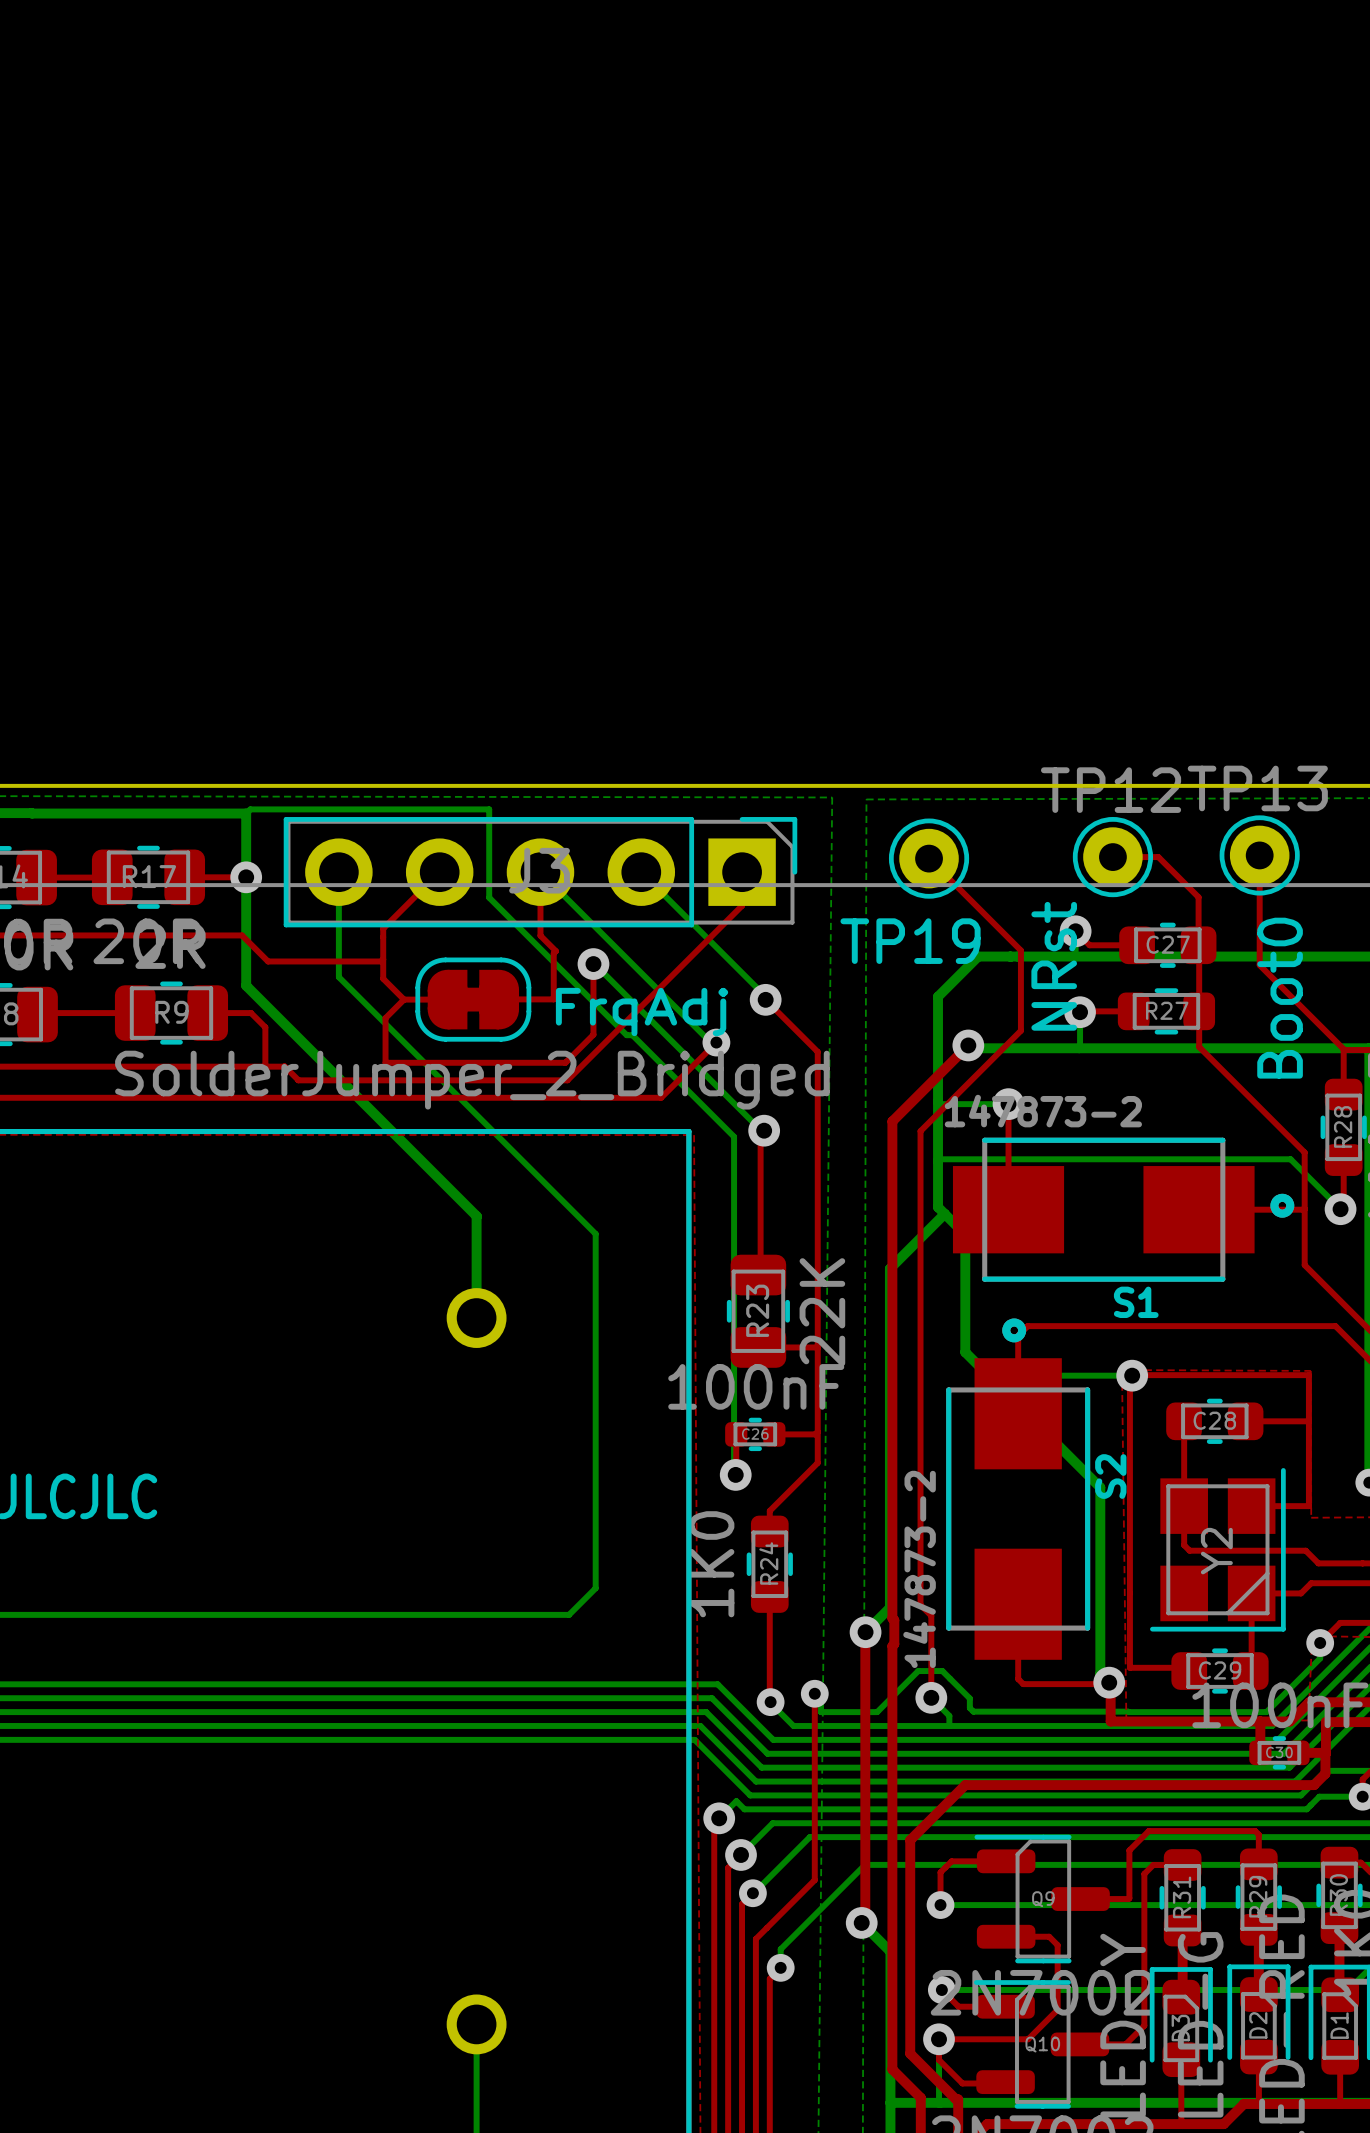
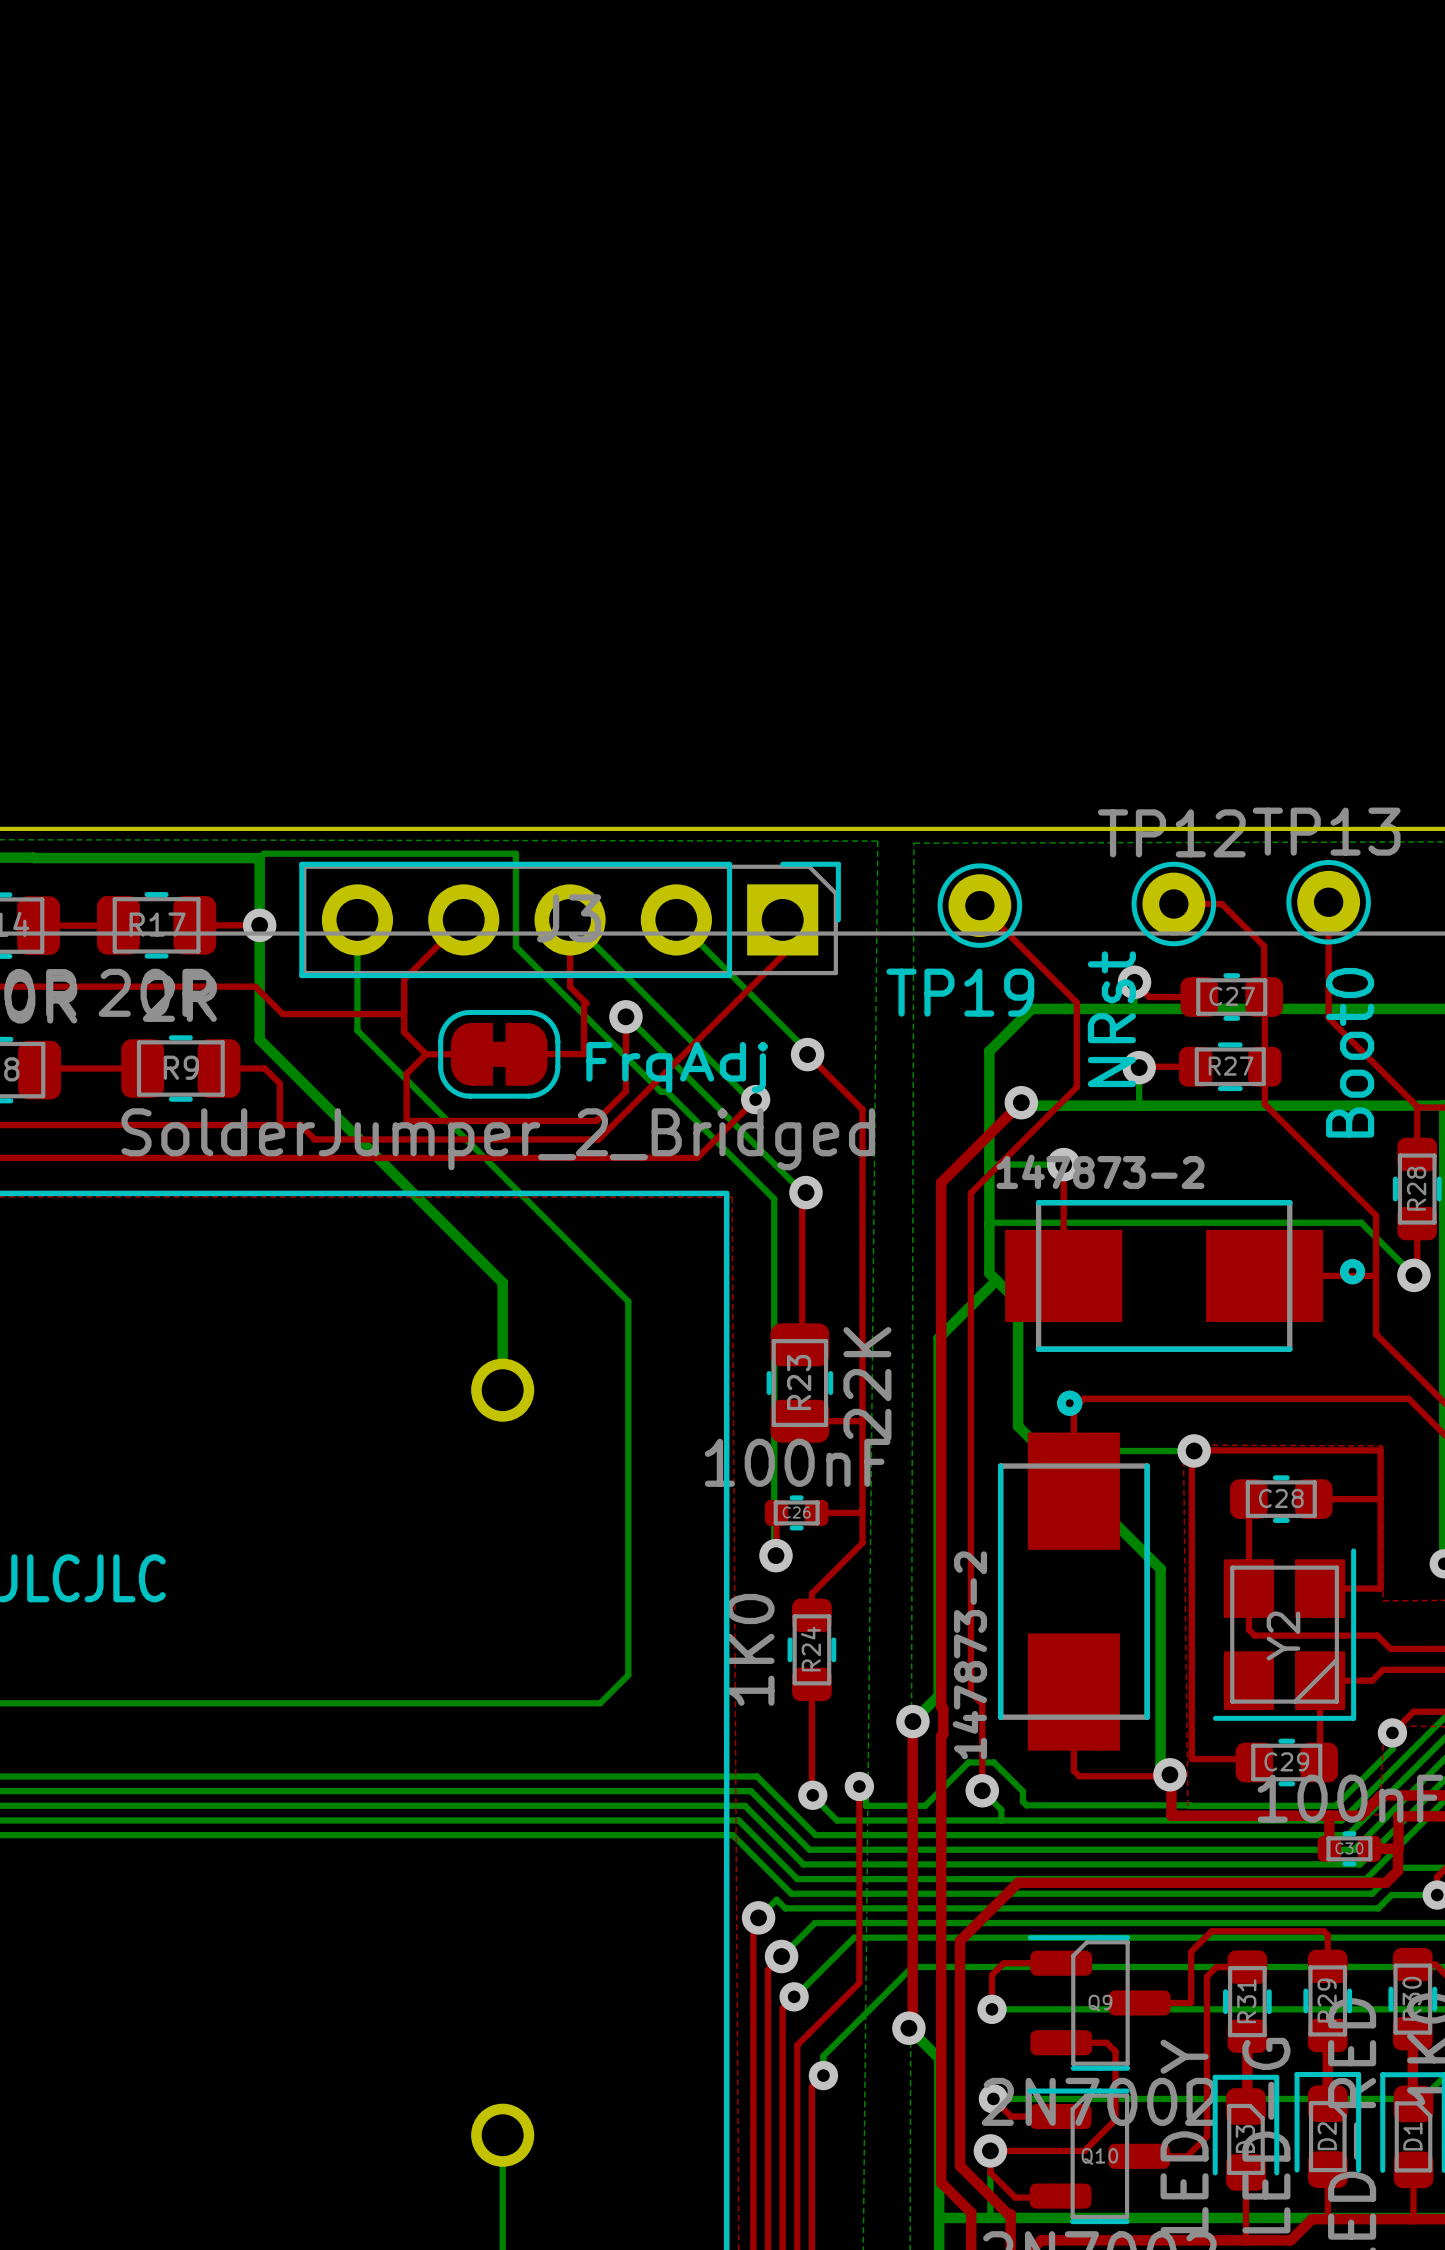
S1 name: S1 (1136, 1302) -> none
S2 name: S2 (1110, 1476) -> none

